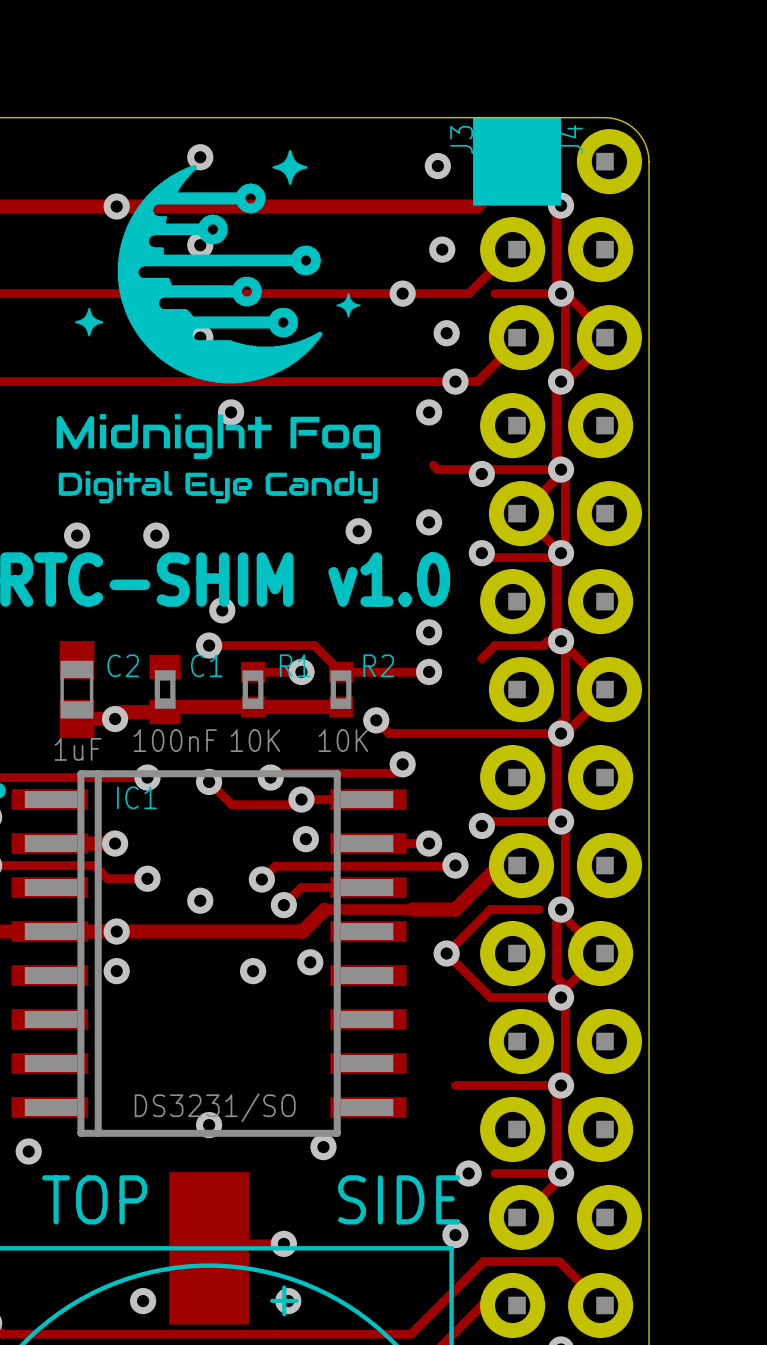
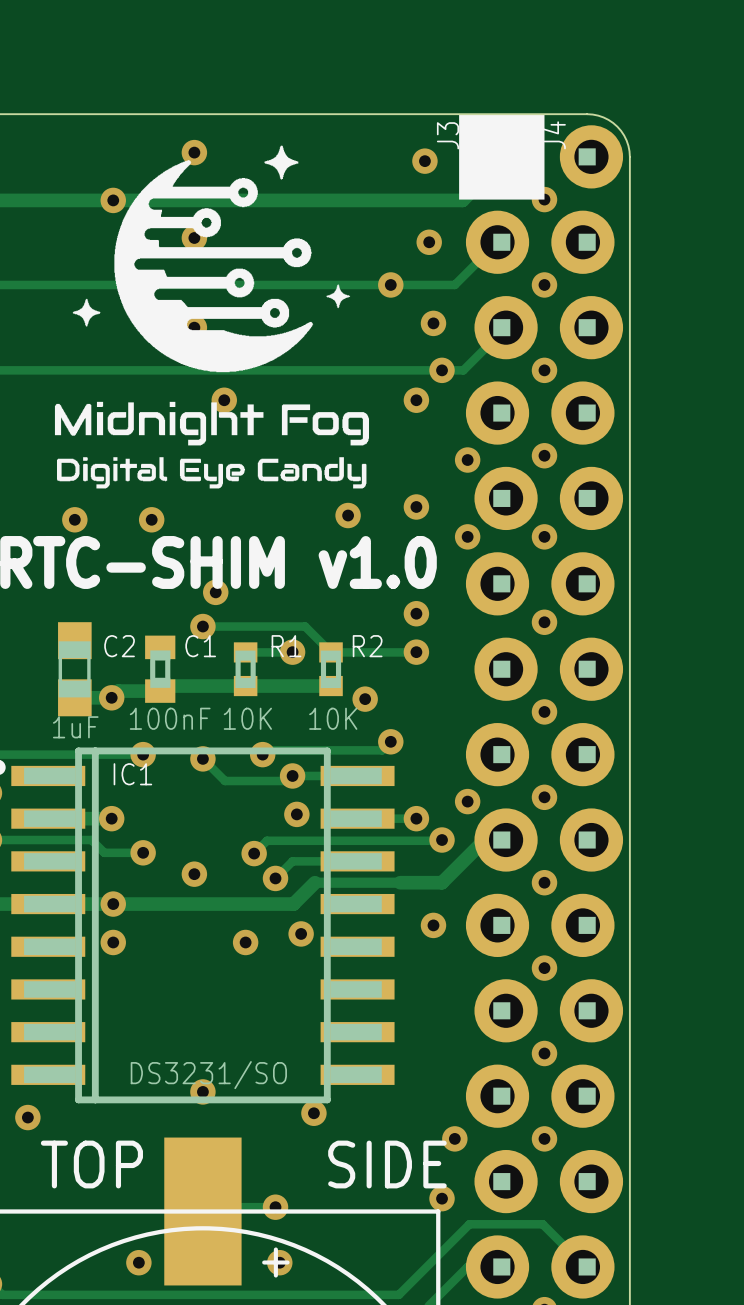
track: (556, 201) (556, 284) (609, 337) (556, 390) (556, 456) (565, 465) (565, 557) (556, 566) (556, 636) (609, 689) (565, 733) (389, 733) (376, 720) -> none
track: (495, 293) (561, 293) -> none
track: (565, 293) (565, 381) -> none
track: (433, 465) (437, 469) (561, 469) (561, 473) (521, 513) (561, 553) (556, 557) (486, 557) (481, 553) -> none
track: (561, 641) (547, 641) (543, 645) (495, 645) (481, 658) -> none
track: (565, 645) (565, 718) (561, 722) (561, 733) -> none
track: (556, 733) (556, 817) (565, 825) (565, 918) (600, 953) (556, 997) (490, 997) (446, 953) (490, 909) (539, 909) -> none
track: (561, 821) (486, 821) (481, 825) -> none
track: (565, 913) (556, 922) (556, 977) (561, 981) (561, 1003) (565, 1008) (565, 1079) (556, 1088) (556, 1182) (521, 1217) -> none
track: (455, 1085) (561, 1085) -> none
track: (495, 1173) (561, 1173) -> none

